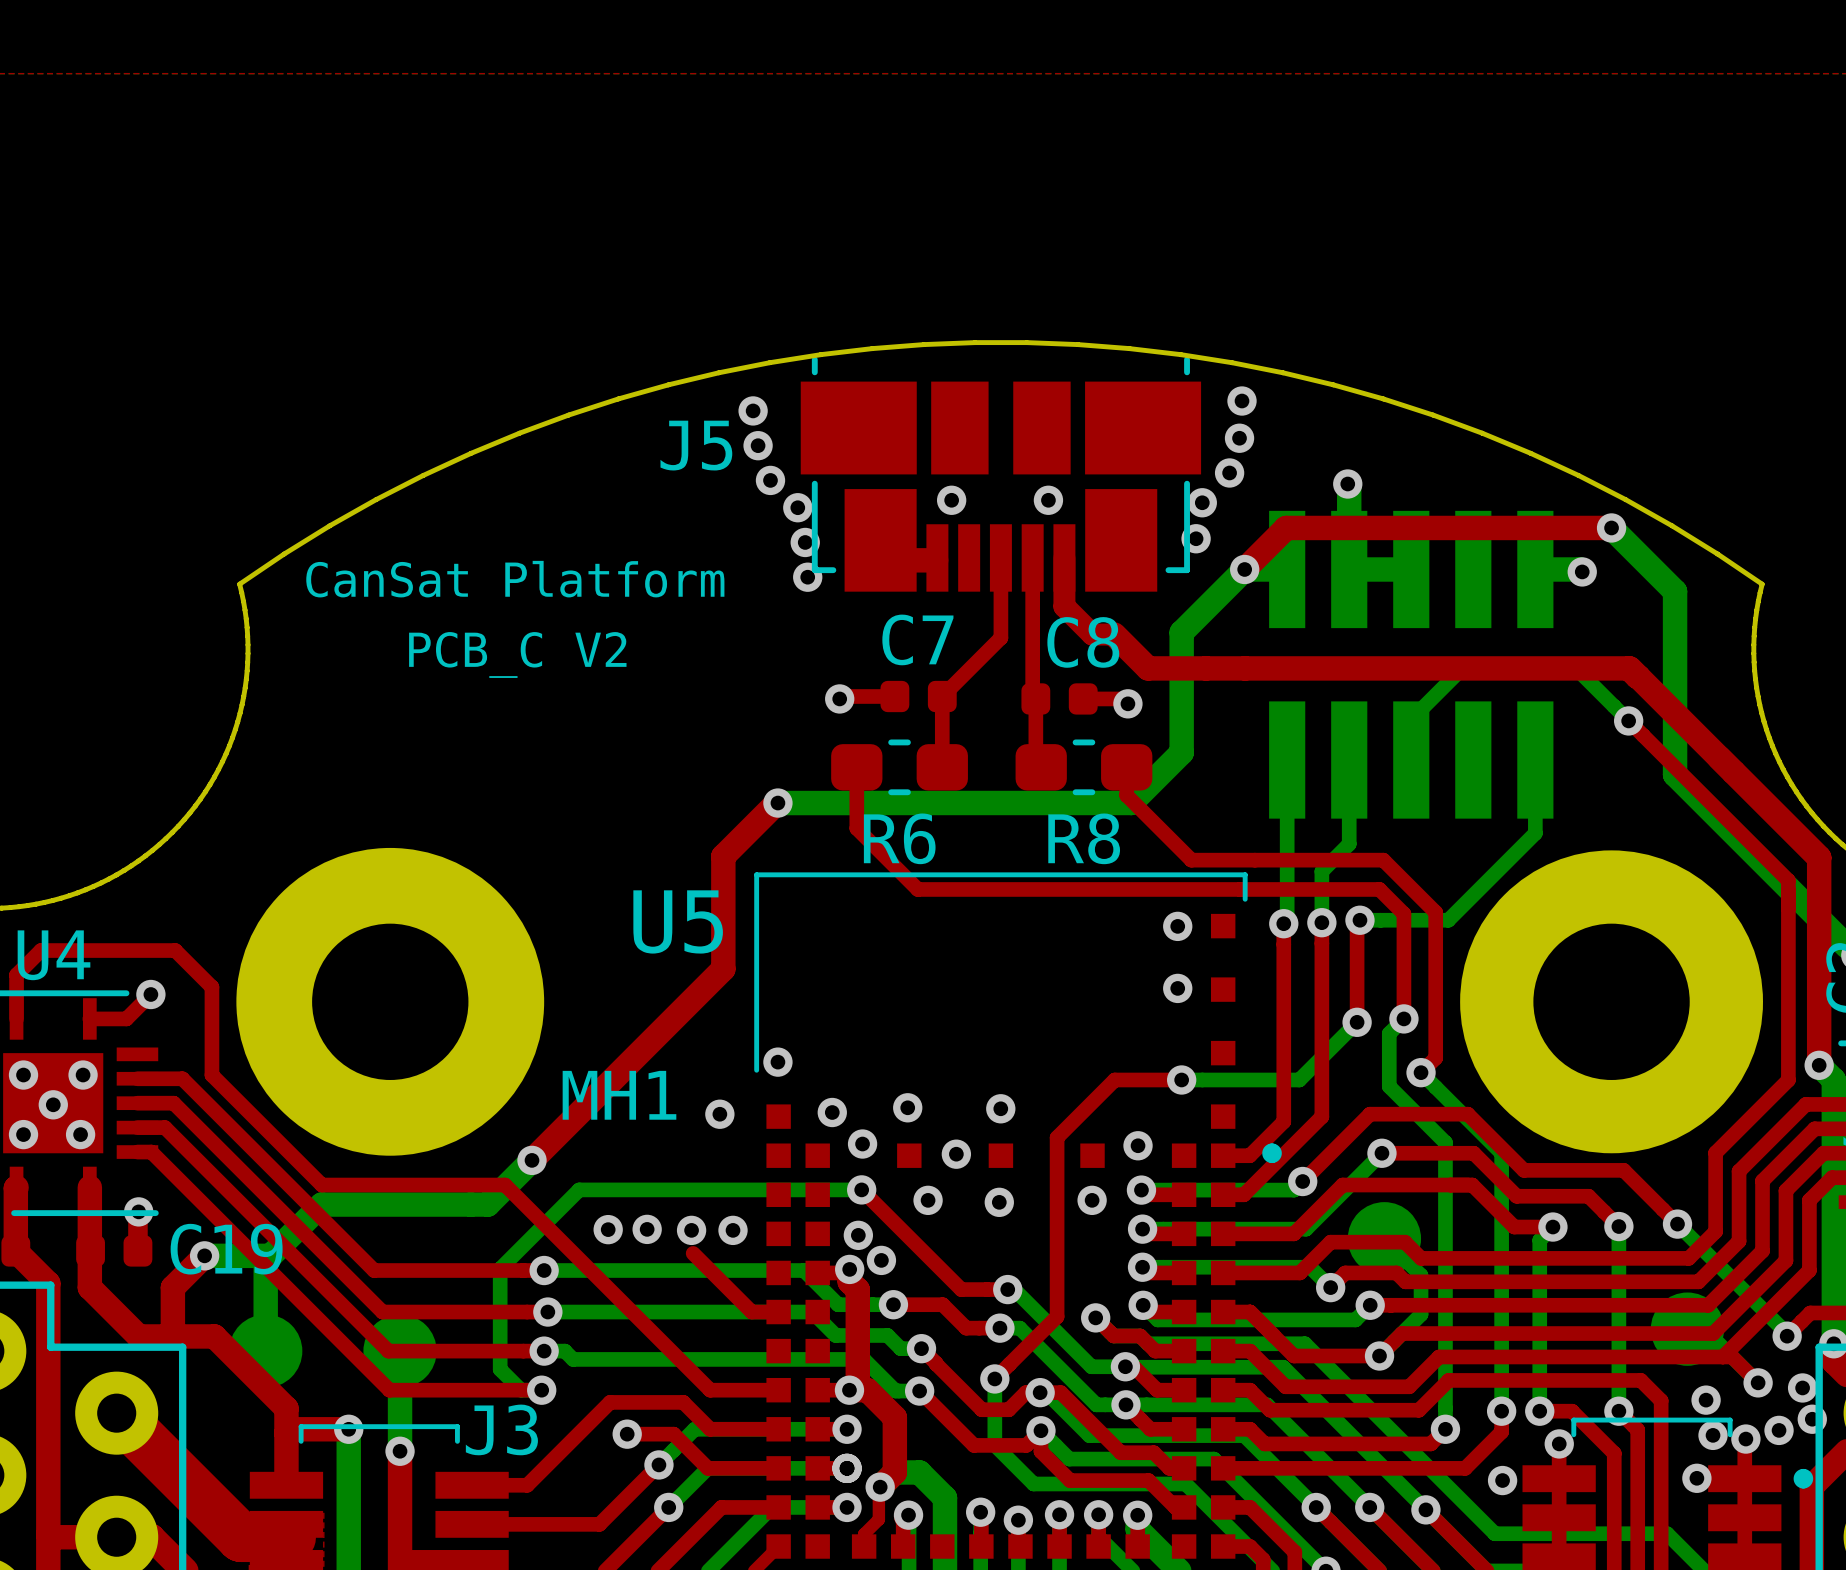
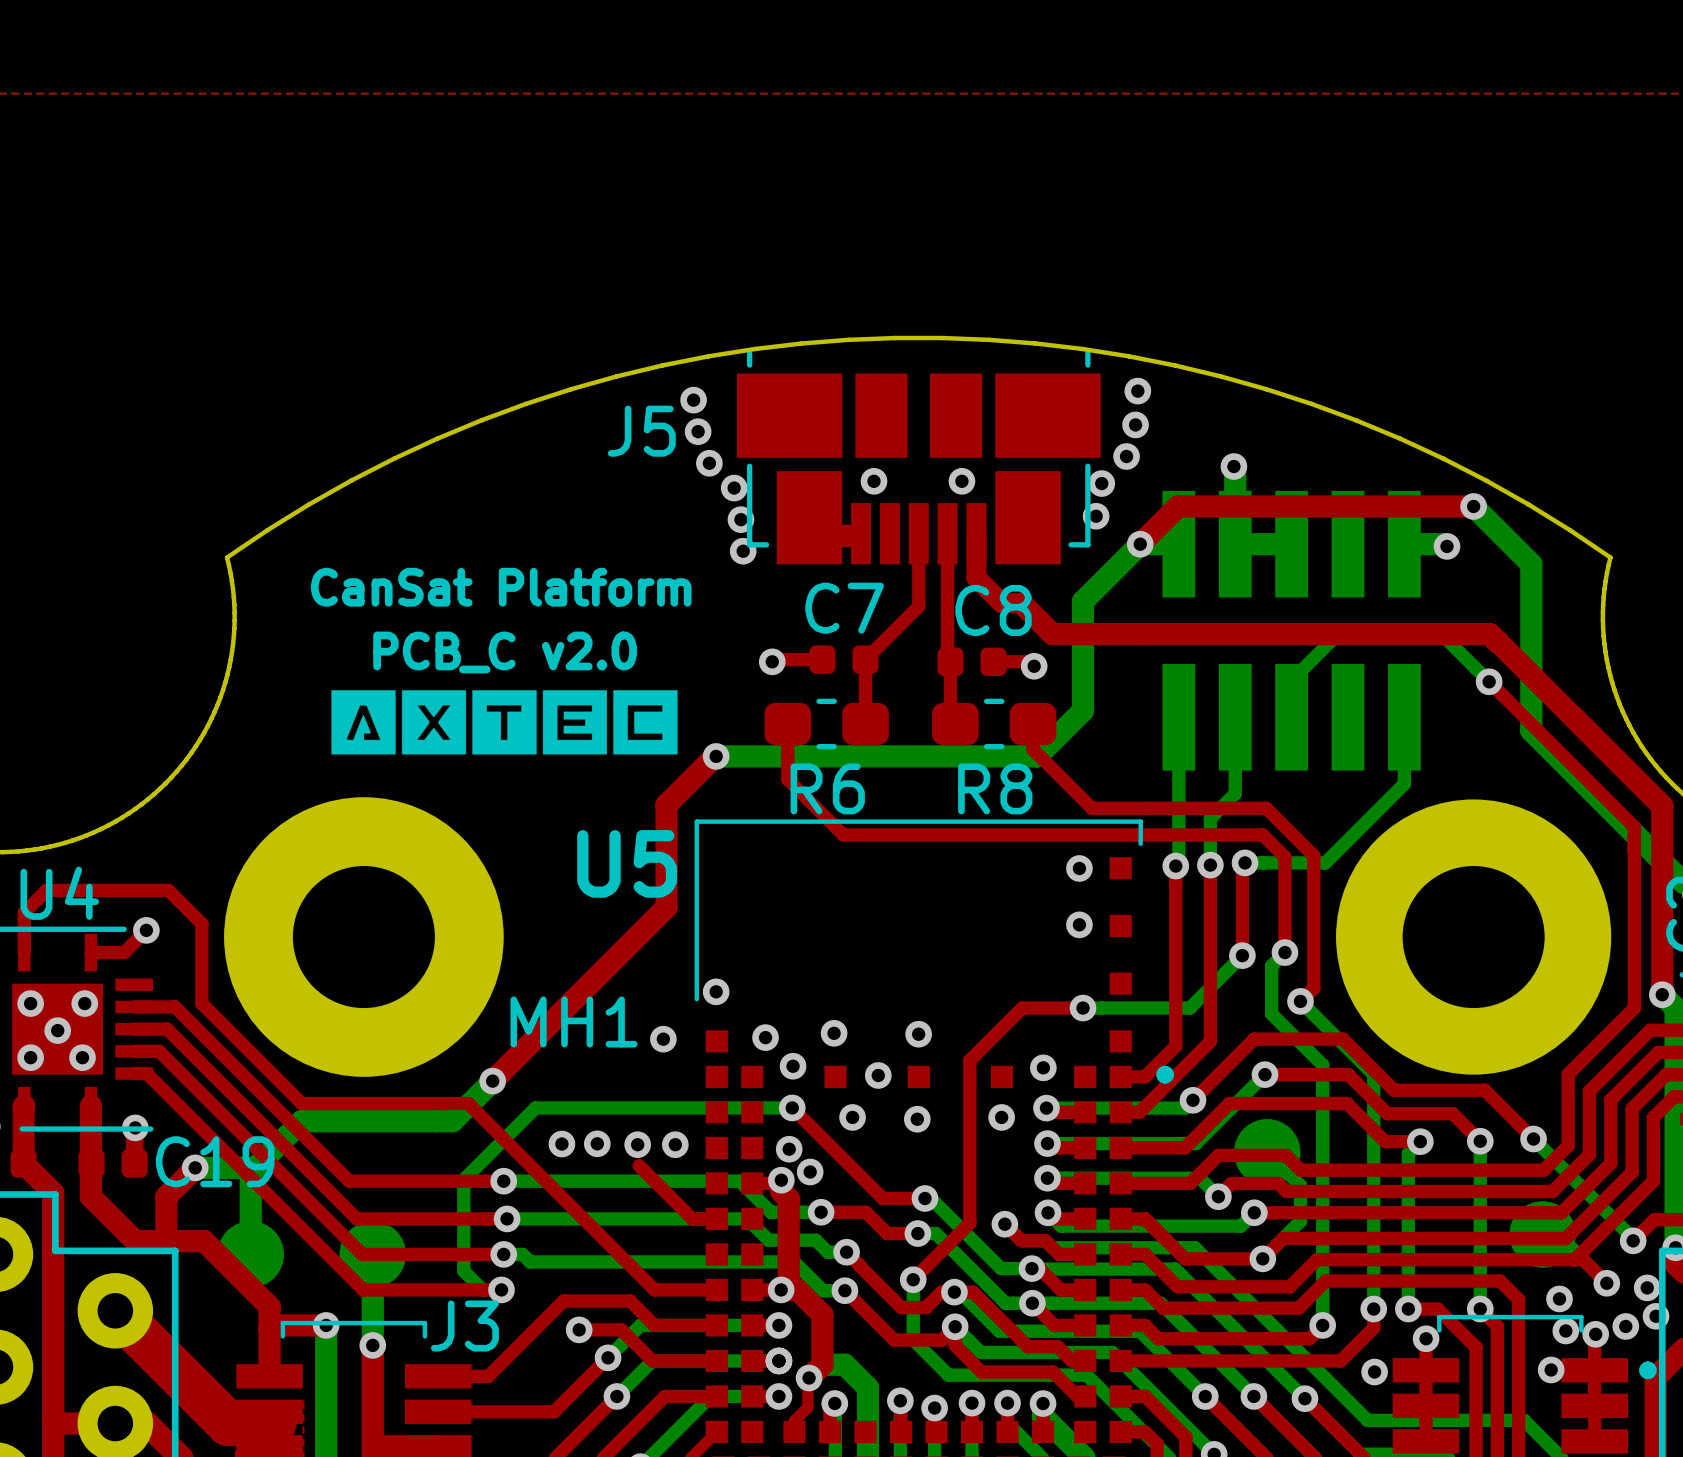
text position: CanSat Platform (515, 579) -> CanSat Platform (501, 587)
text: PCB_C V2 (517, 654) -> PCB_C v2.0 (505, 652)
drawing: none -> [331, 690, 678, 755]

